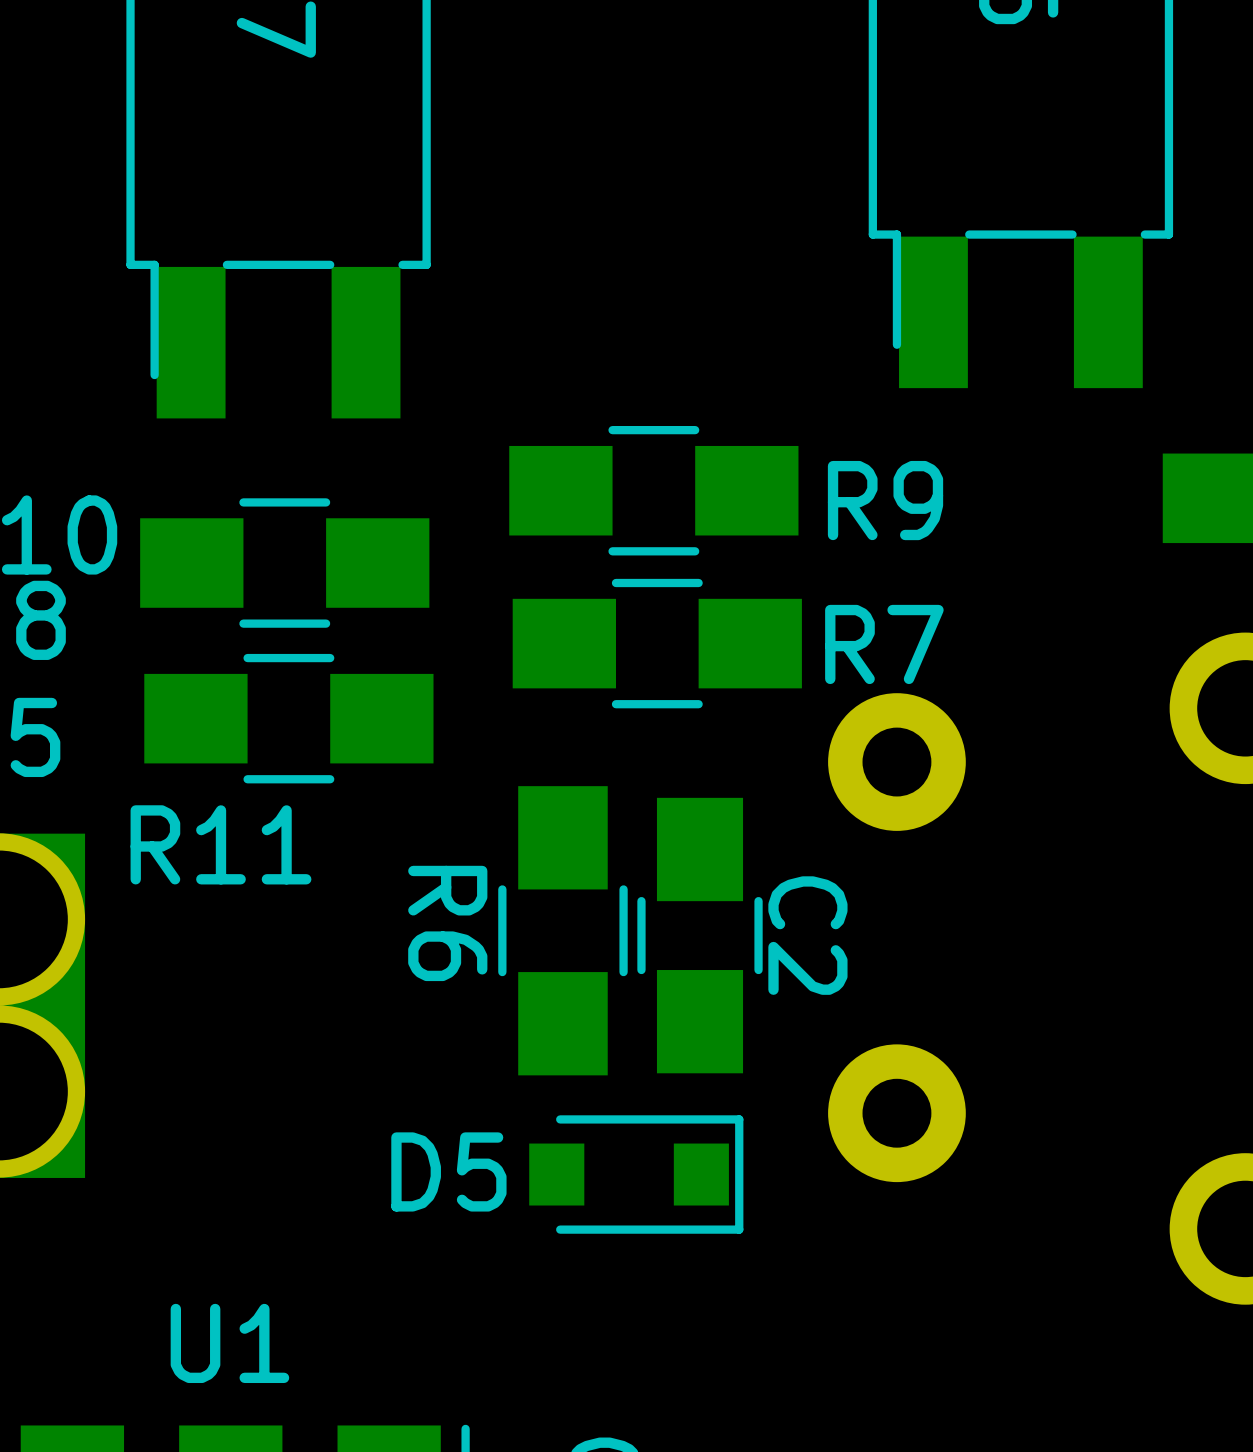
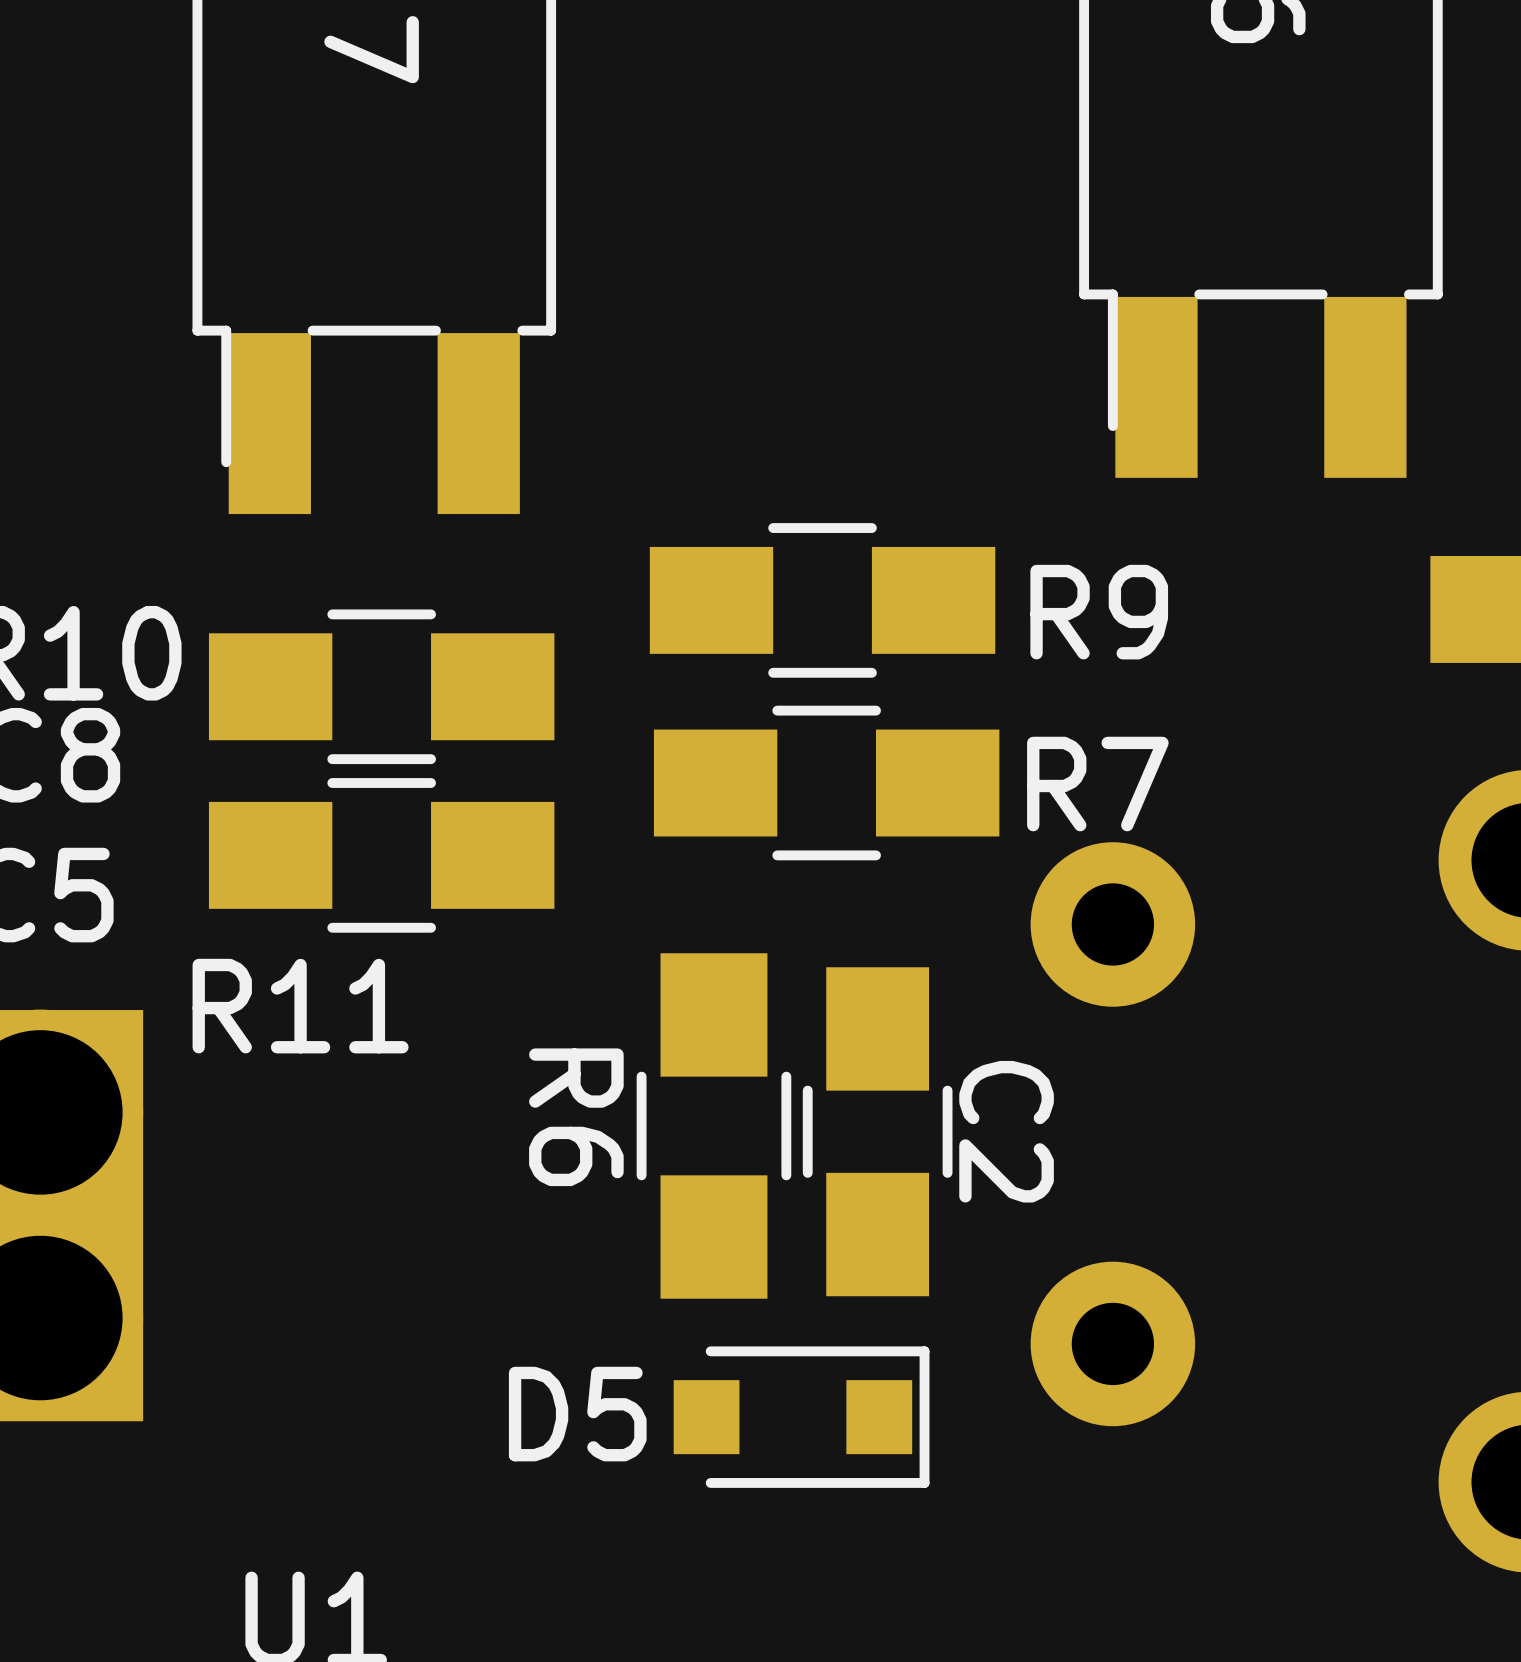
R11 position: (288, 718) -> (381, 855)

